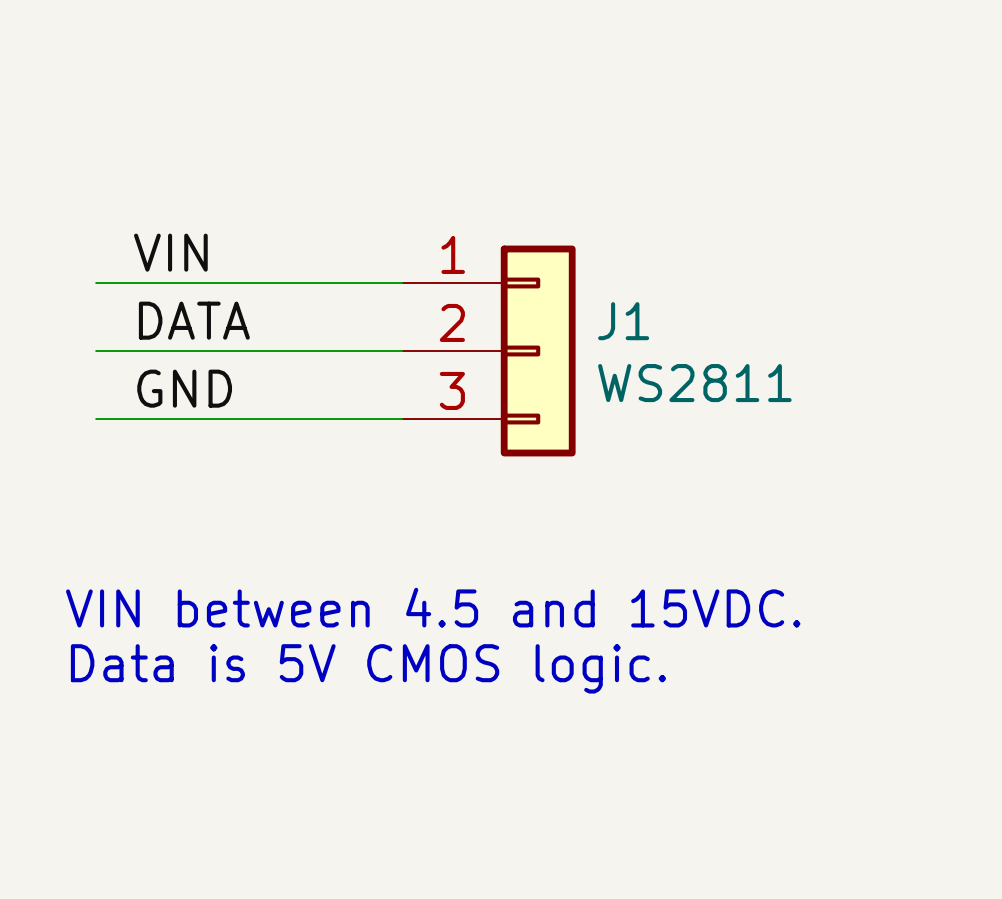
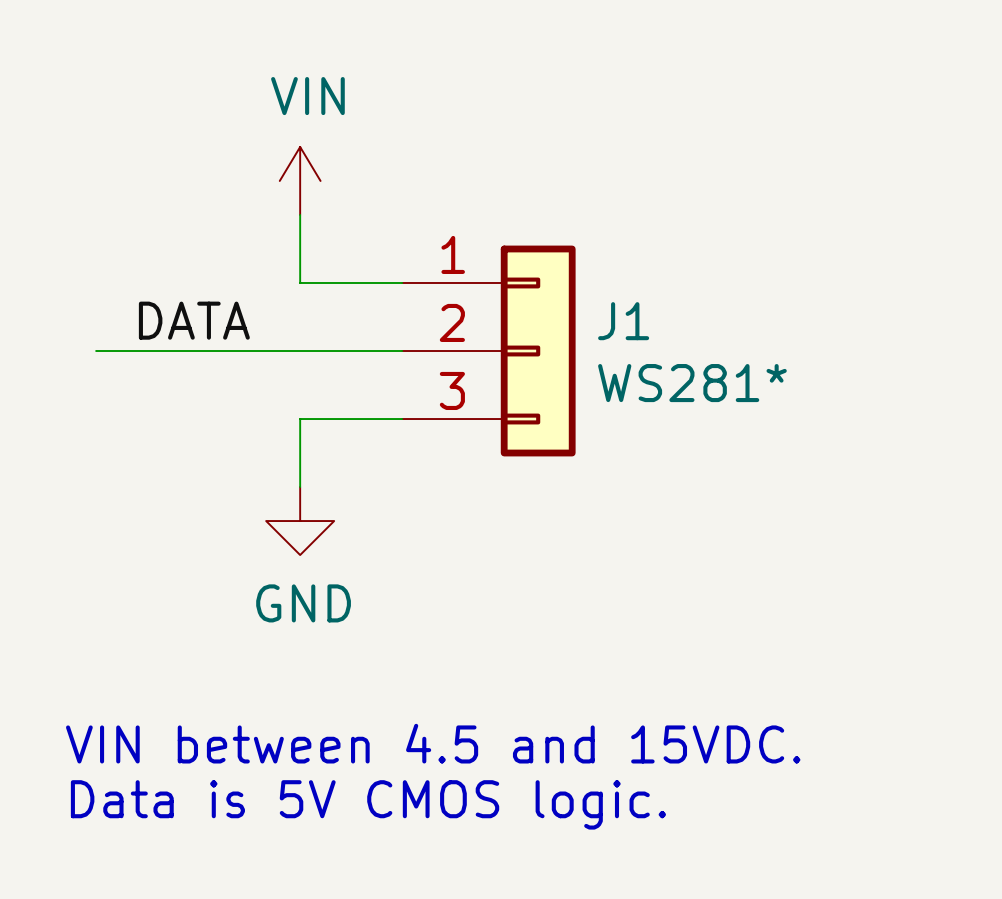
power symbol: none -> VIN (300, 180)
label: VIN (170, 252) -> none
wire: (96, 282) (300, 282) -> (300, 214) (300, 282)
J1 value: WS2811 (694, 383) -> WS281* (692, 383)
label: GND (184, 388) -> none
wire: (96, 419) (300, 419) -> (300, 487) (300, 419)
power symbol: none -> GND (300, 521)
text position: VIN between 4.5 and 15VDC. (433, 607) -> VIN between 4.5 and 15VDC. (433, 743)
text position: Data is 5V CMOS logic. (368, 668) -> Data is 5V CMOS logic. (368, 804)

